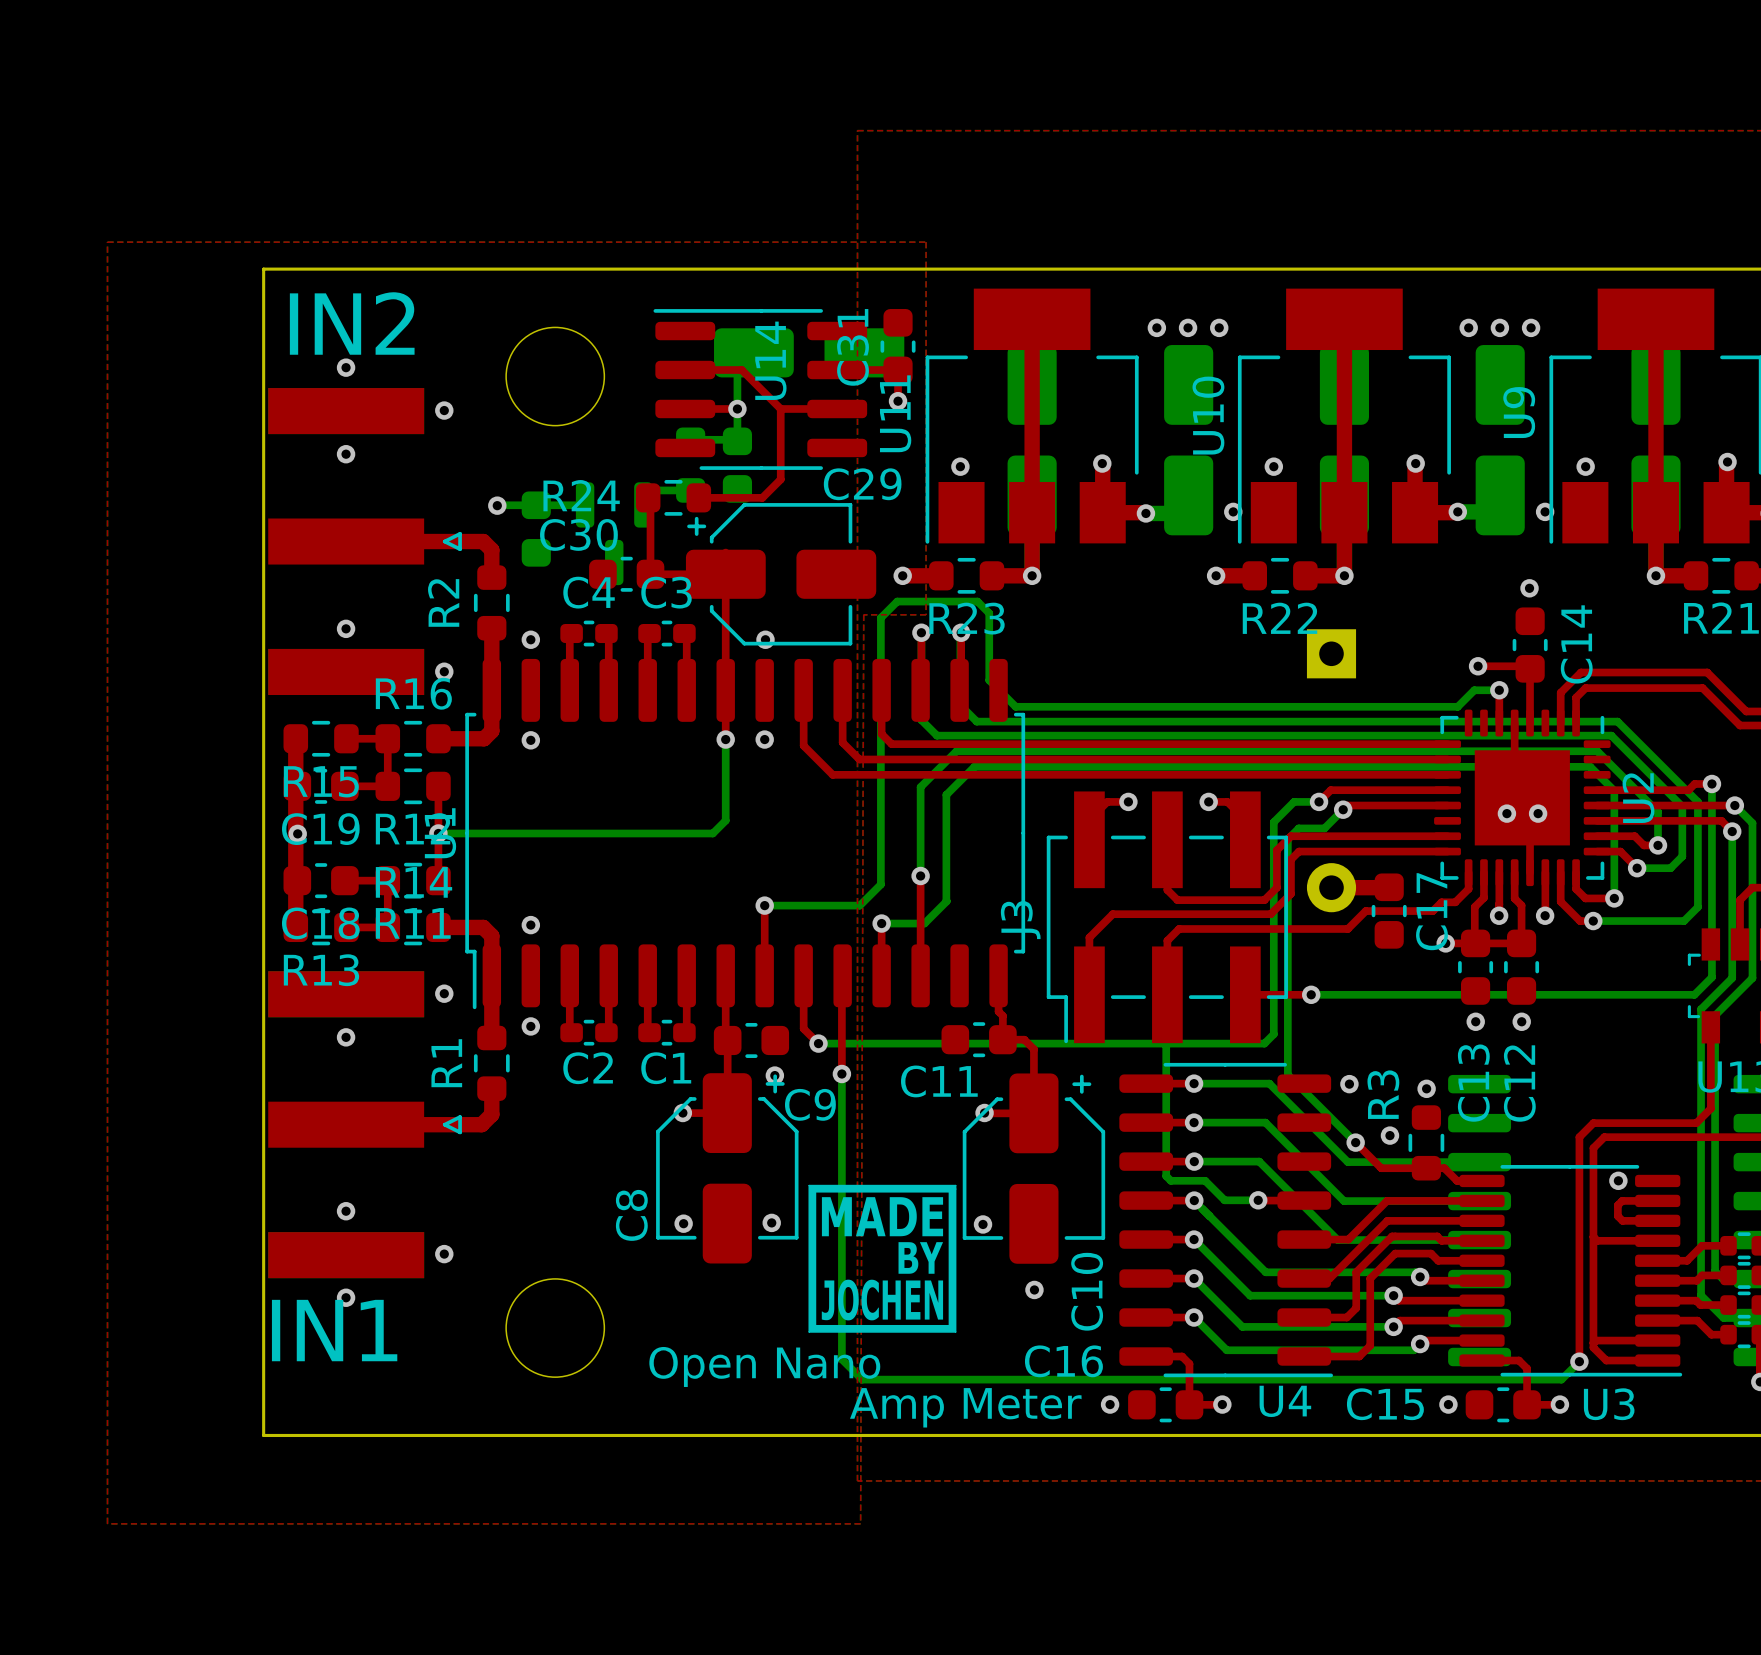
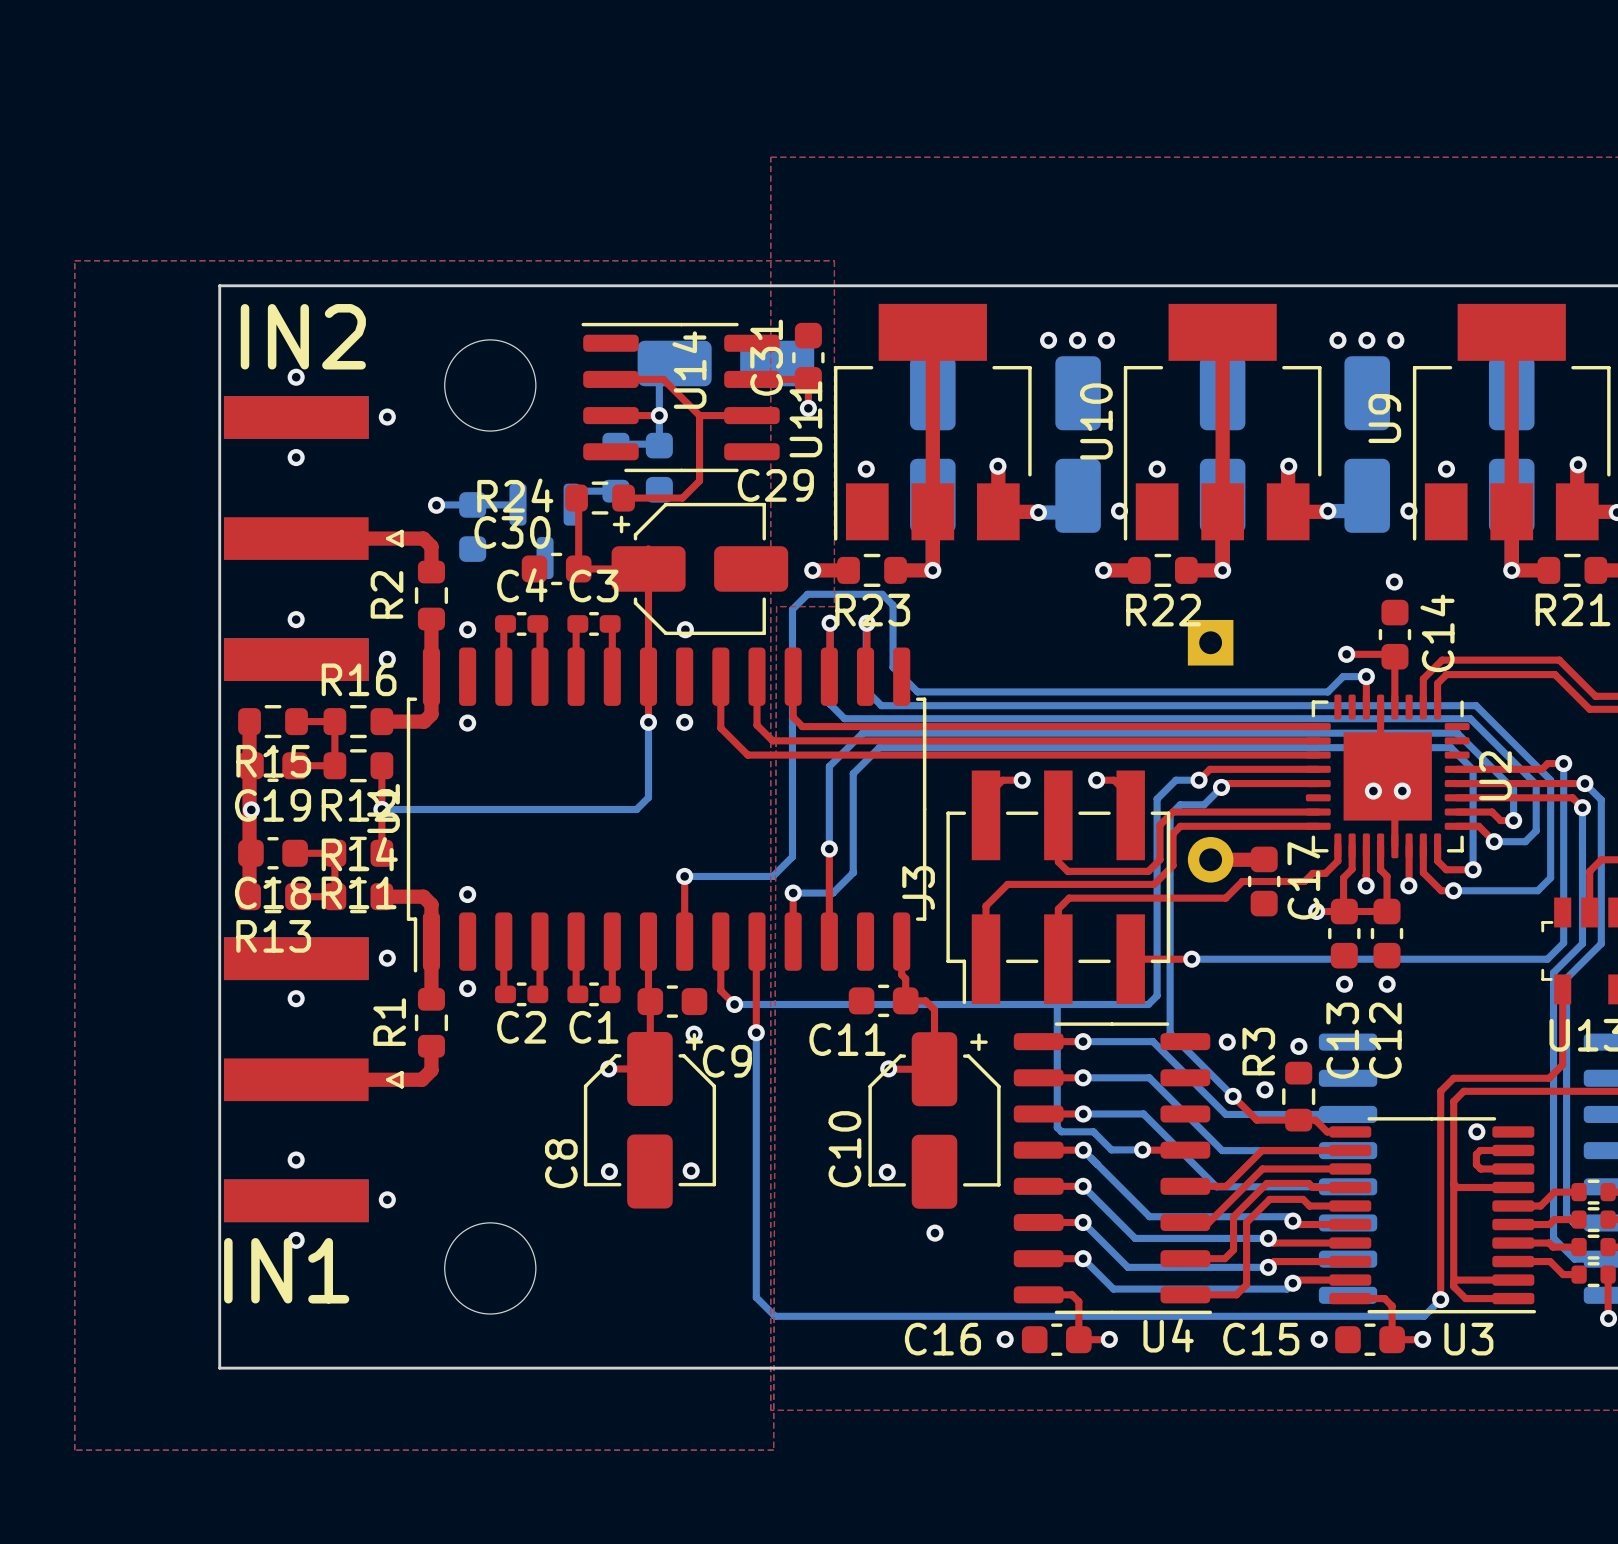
drawing: [808, 1185, 957, 1333] -> none
C10 name position: C10 (1087, 1291) -> C10 (844, 1149)
C16 name position: C16 (1063, 1361) -> C16 (942, 1339)
text: Open Nano (764, 1366) -> none
text: Amp Meter (965, 1407) -> none

